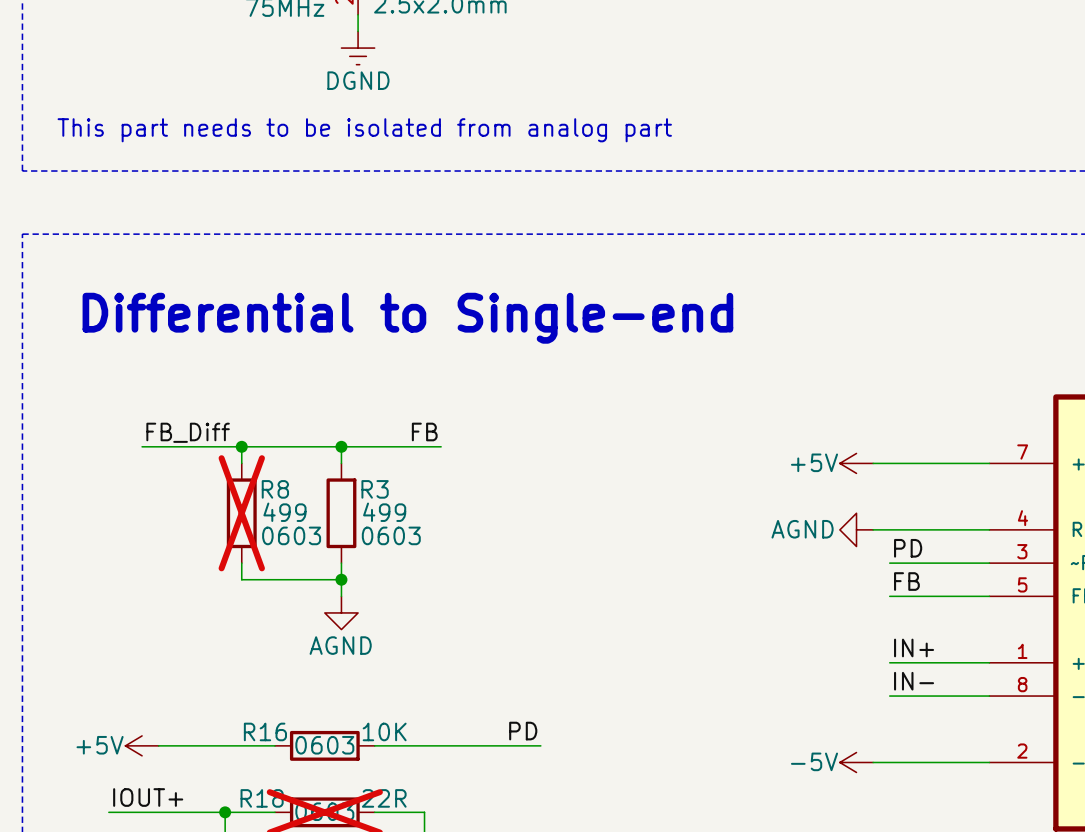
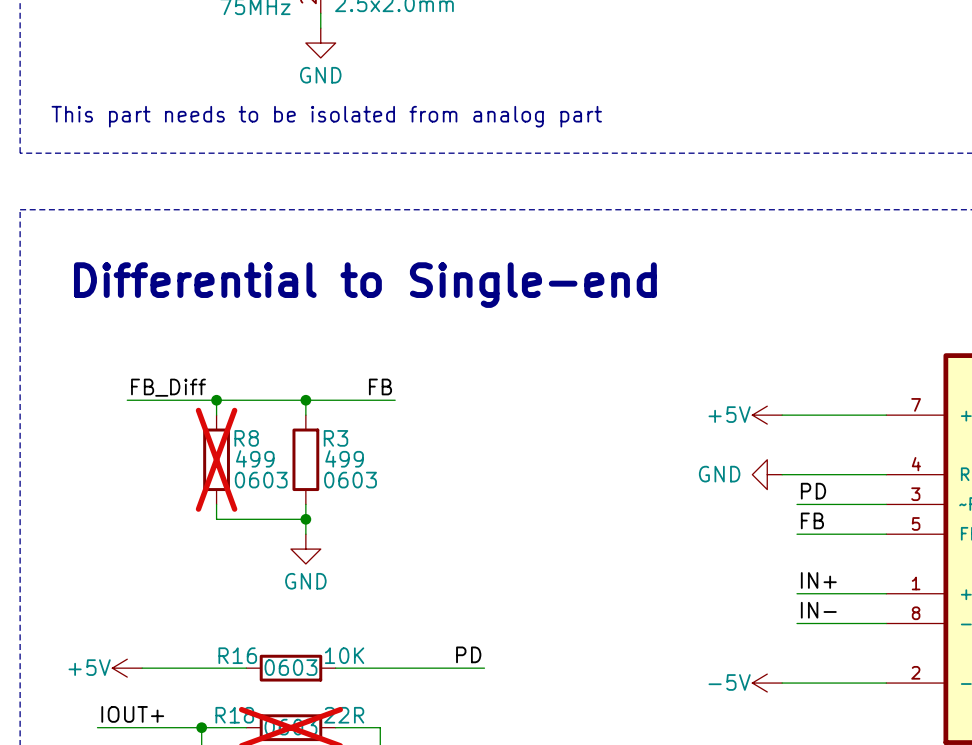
power symbol: DGND (358, 48) -> GND (320, 43)
power symbol: AGND (856, 529) -> GND (767, 474)
power symbol: AGND (341, 612) -> GND (305, 549)

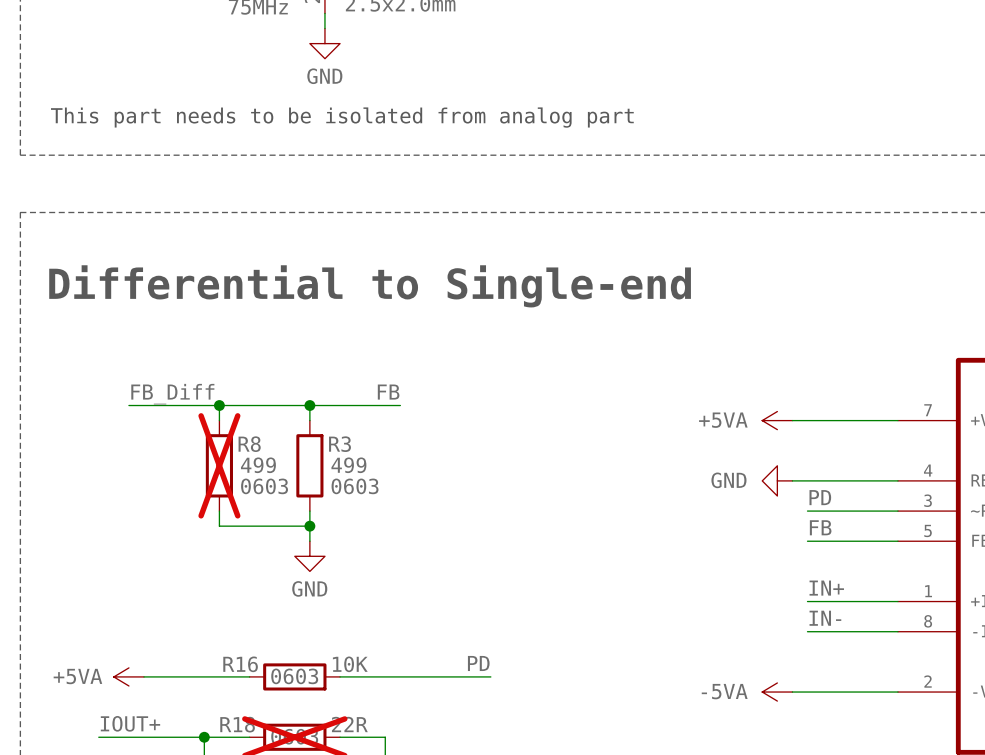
power symbol: +5V (767, 415) -> +5VA (777, 420)
power symbol: +5V (127, 668) -> +5VA (128, 676)
power symbol: -5V (767, 683) -> -5VA (777, 692)

